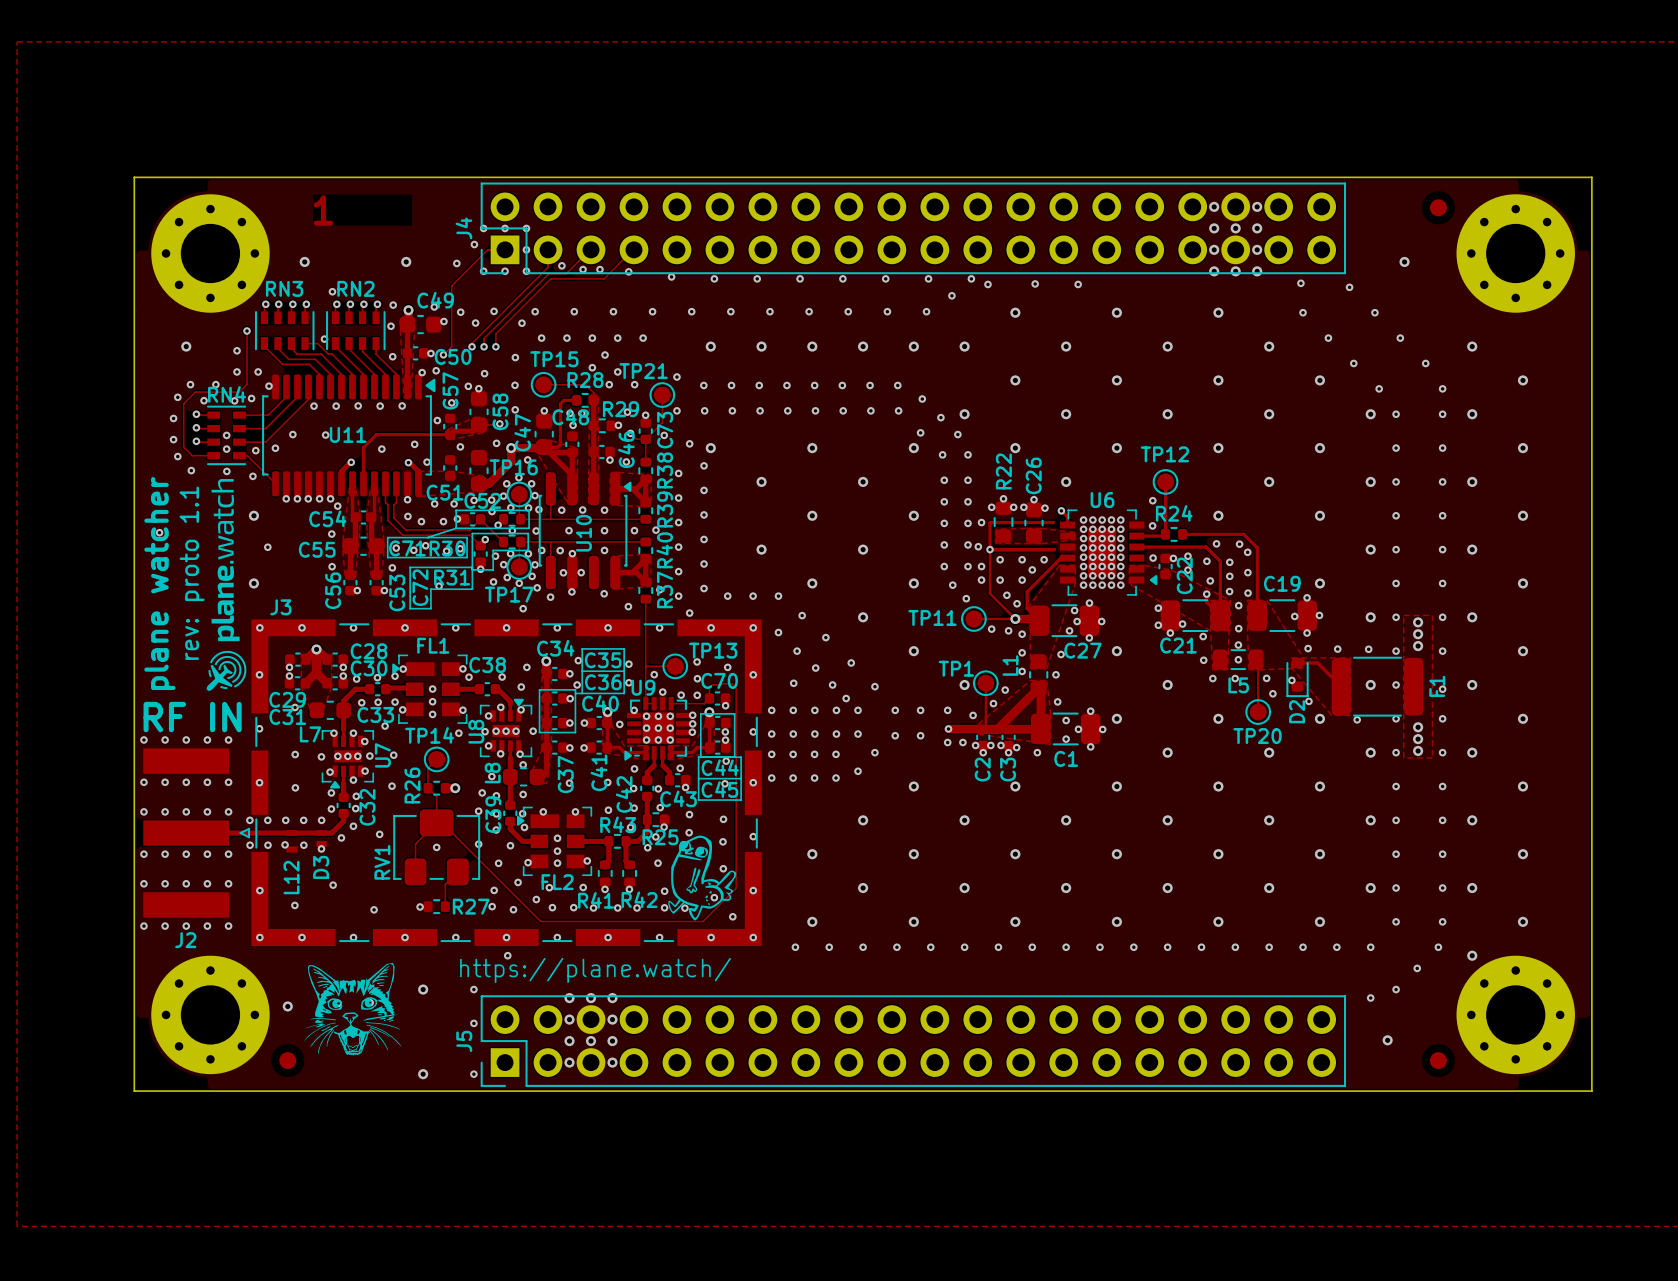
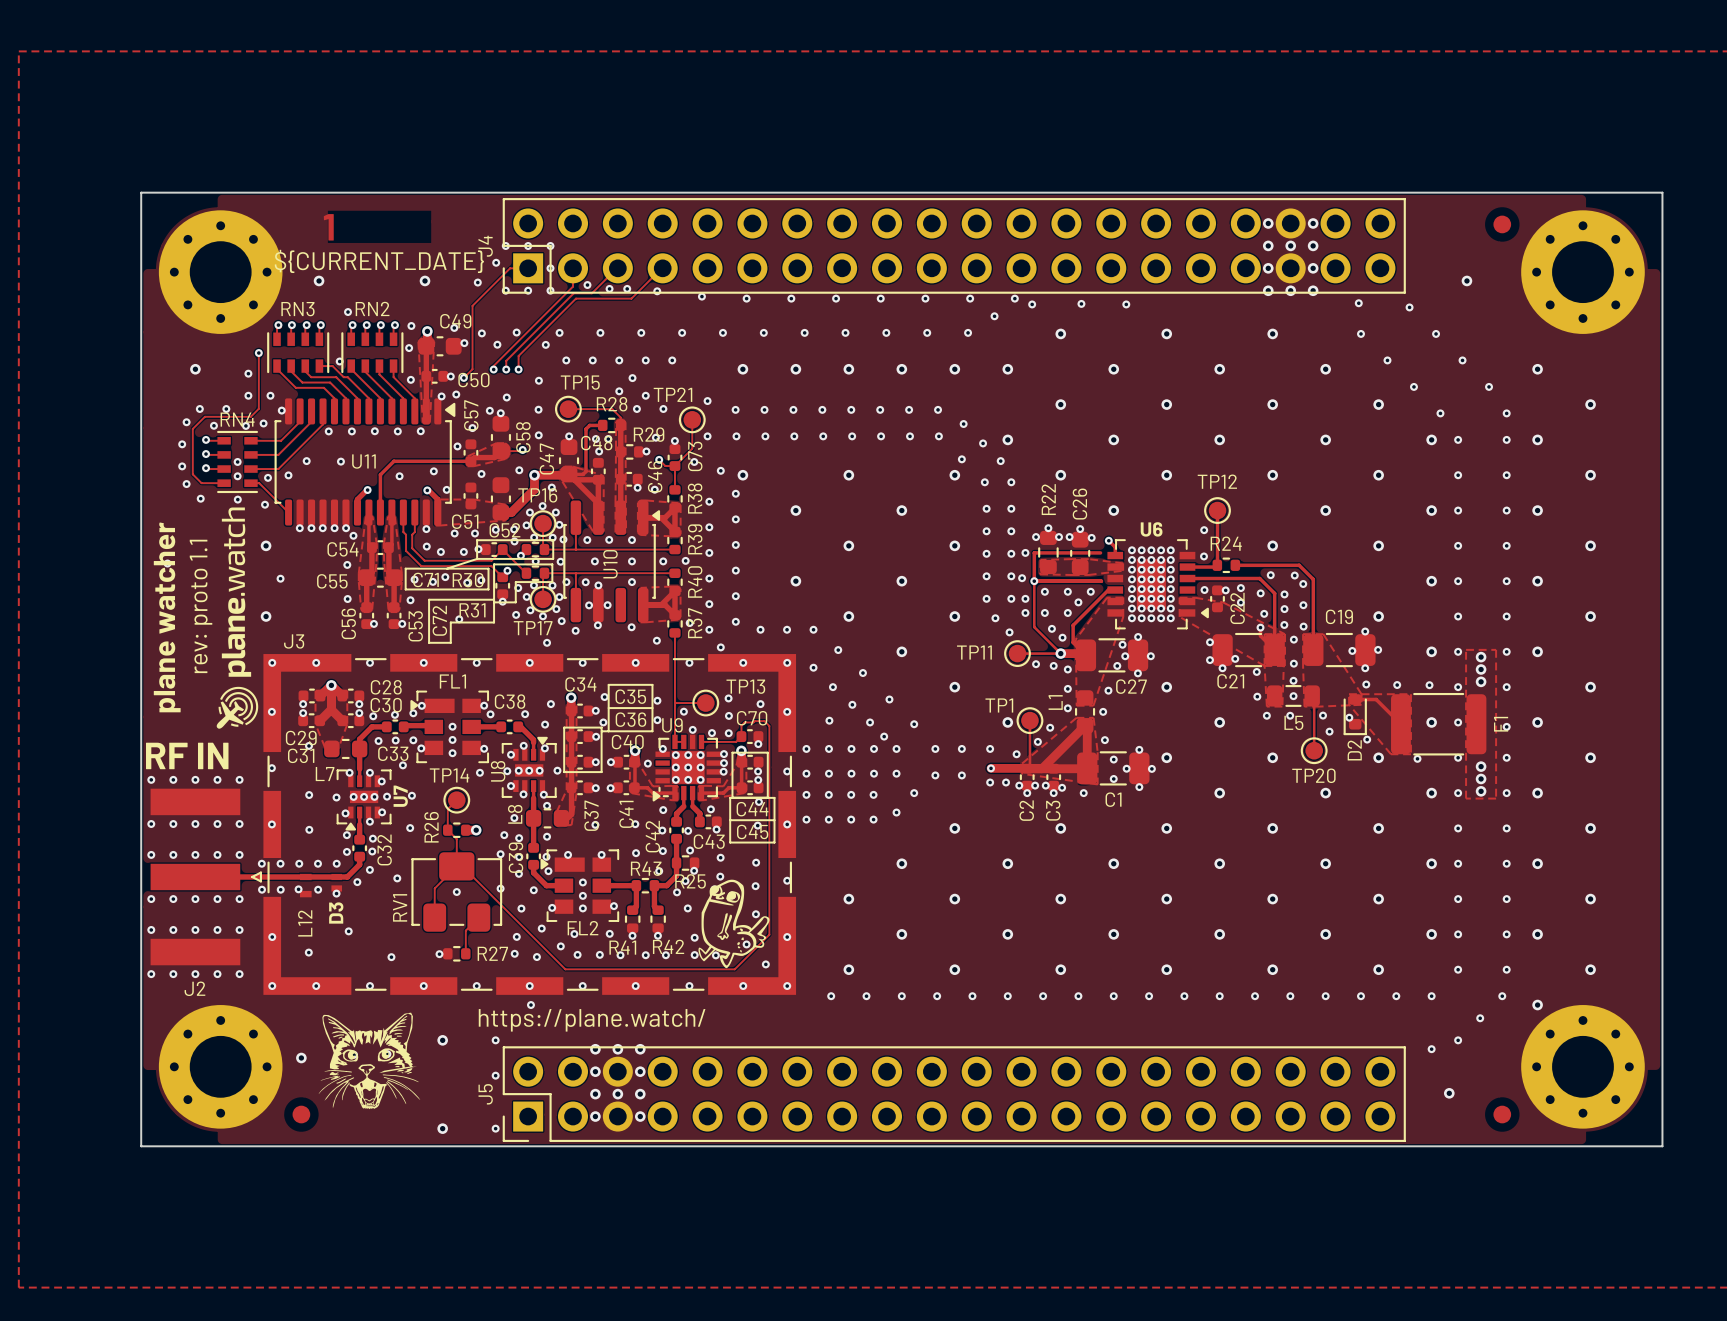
text: none -> ${CURRENT_DATE} (379, 261)

